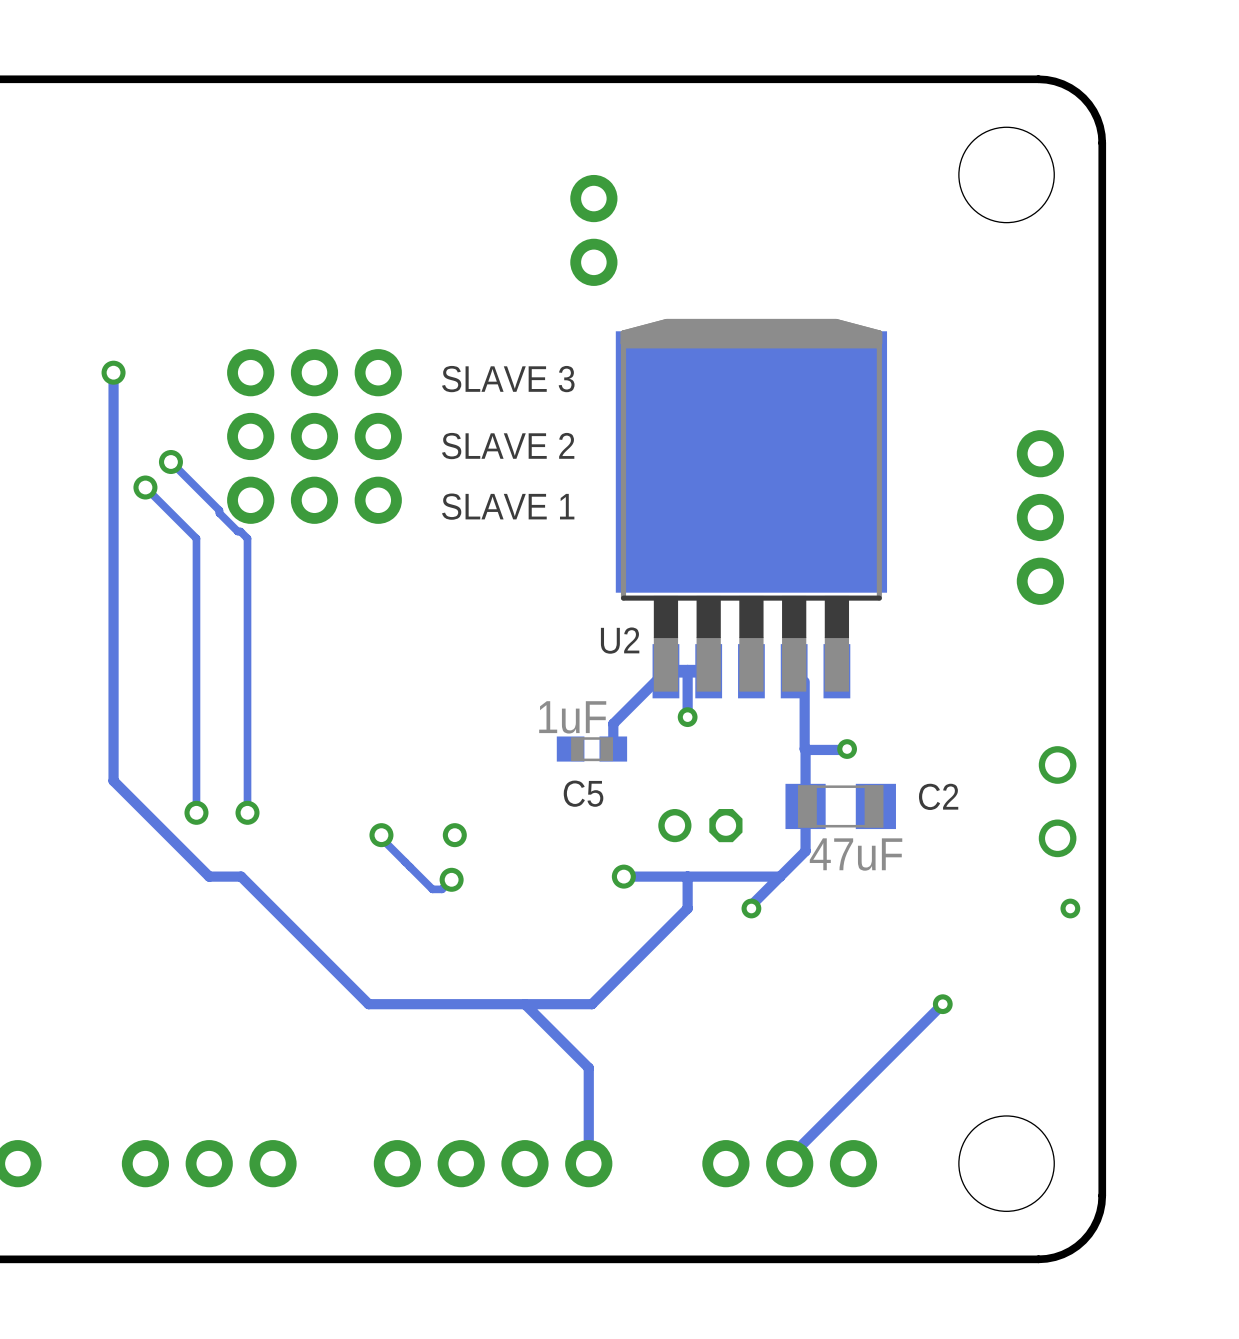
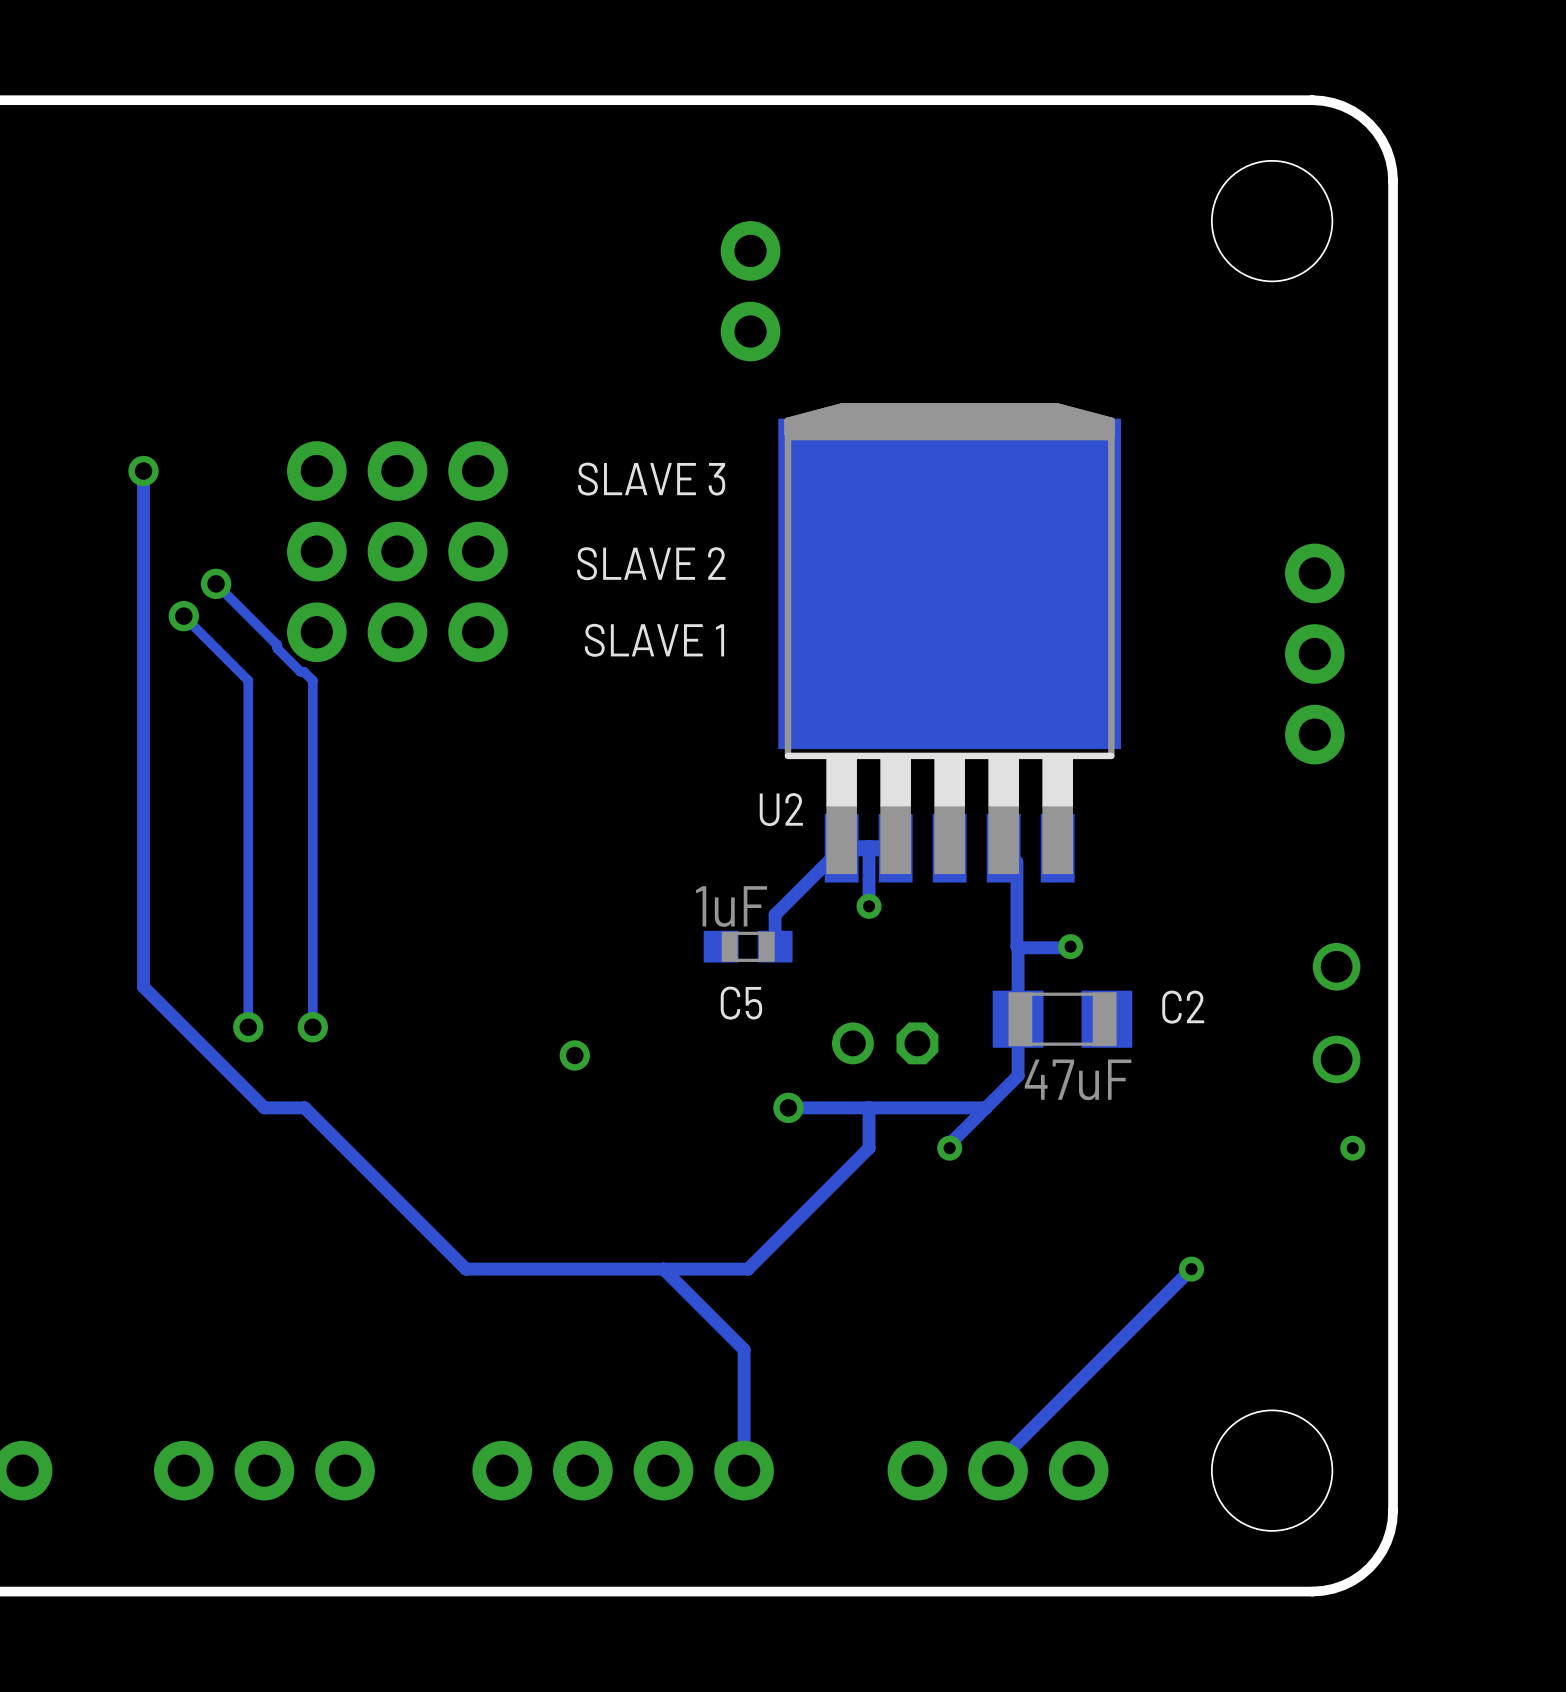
track: (381, 835) (381, 838) (432, 889) (442, 889) (451, 879) -> none
via: (381, 835) -> none
via: (451, 879) -> none

